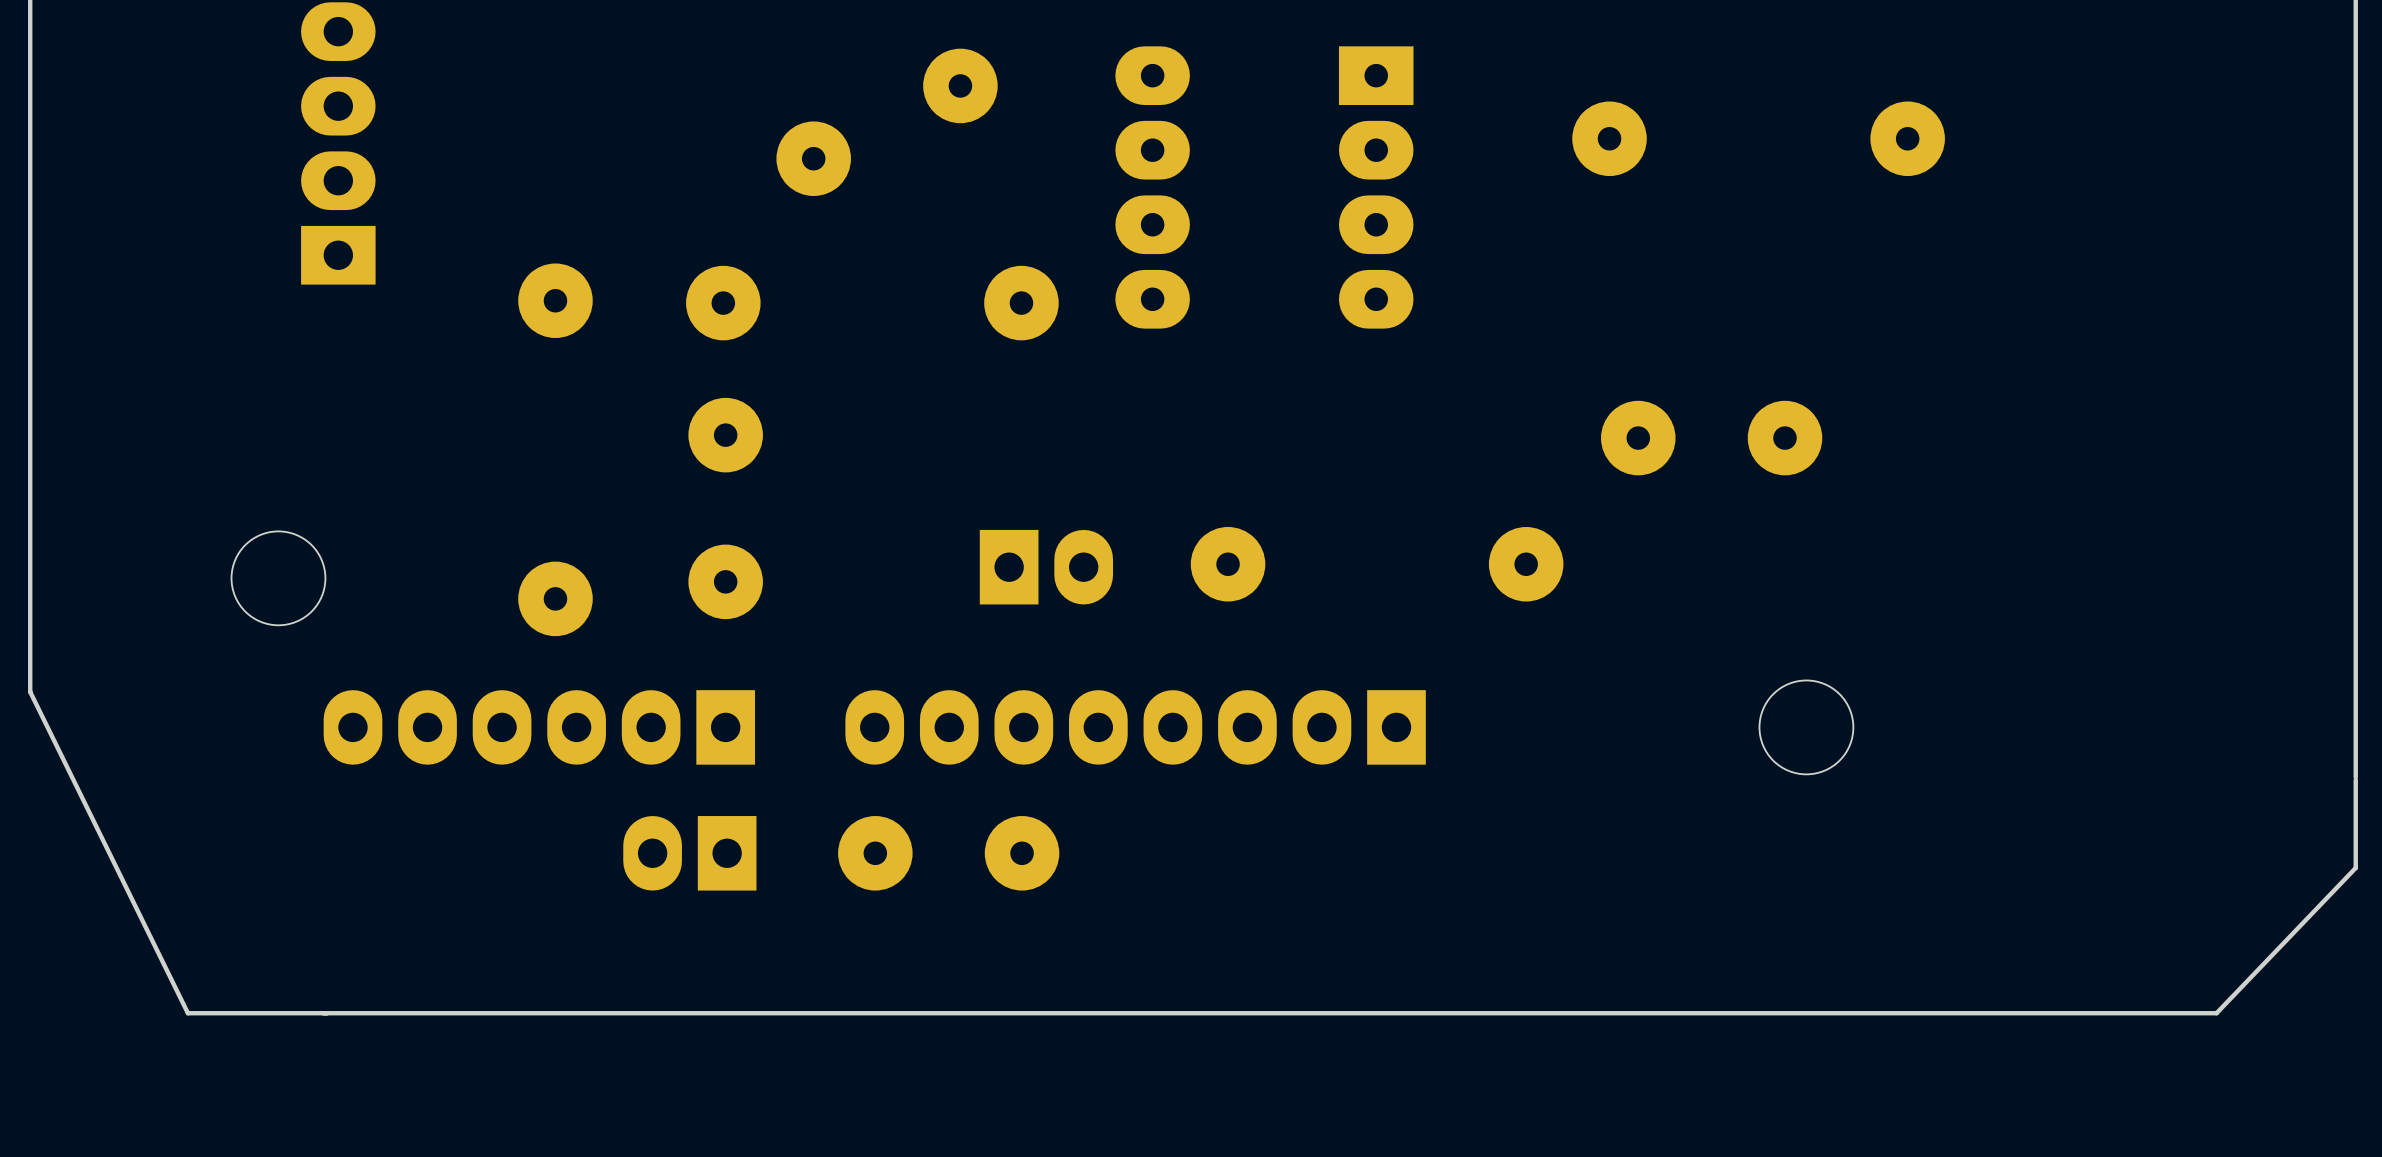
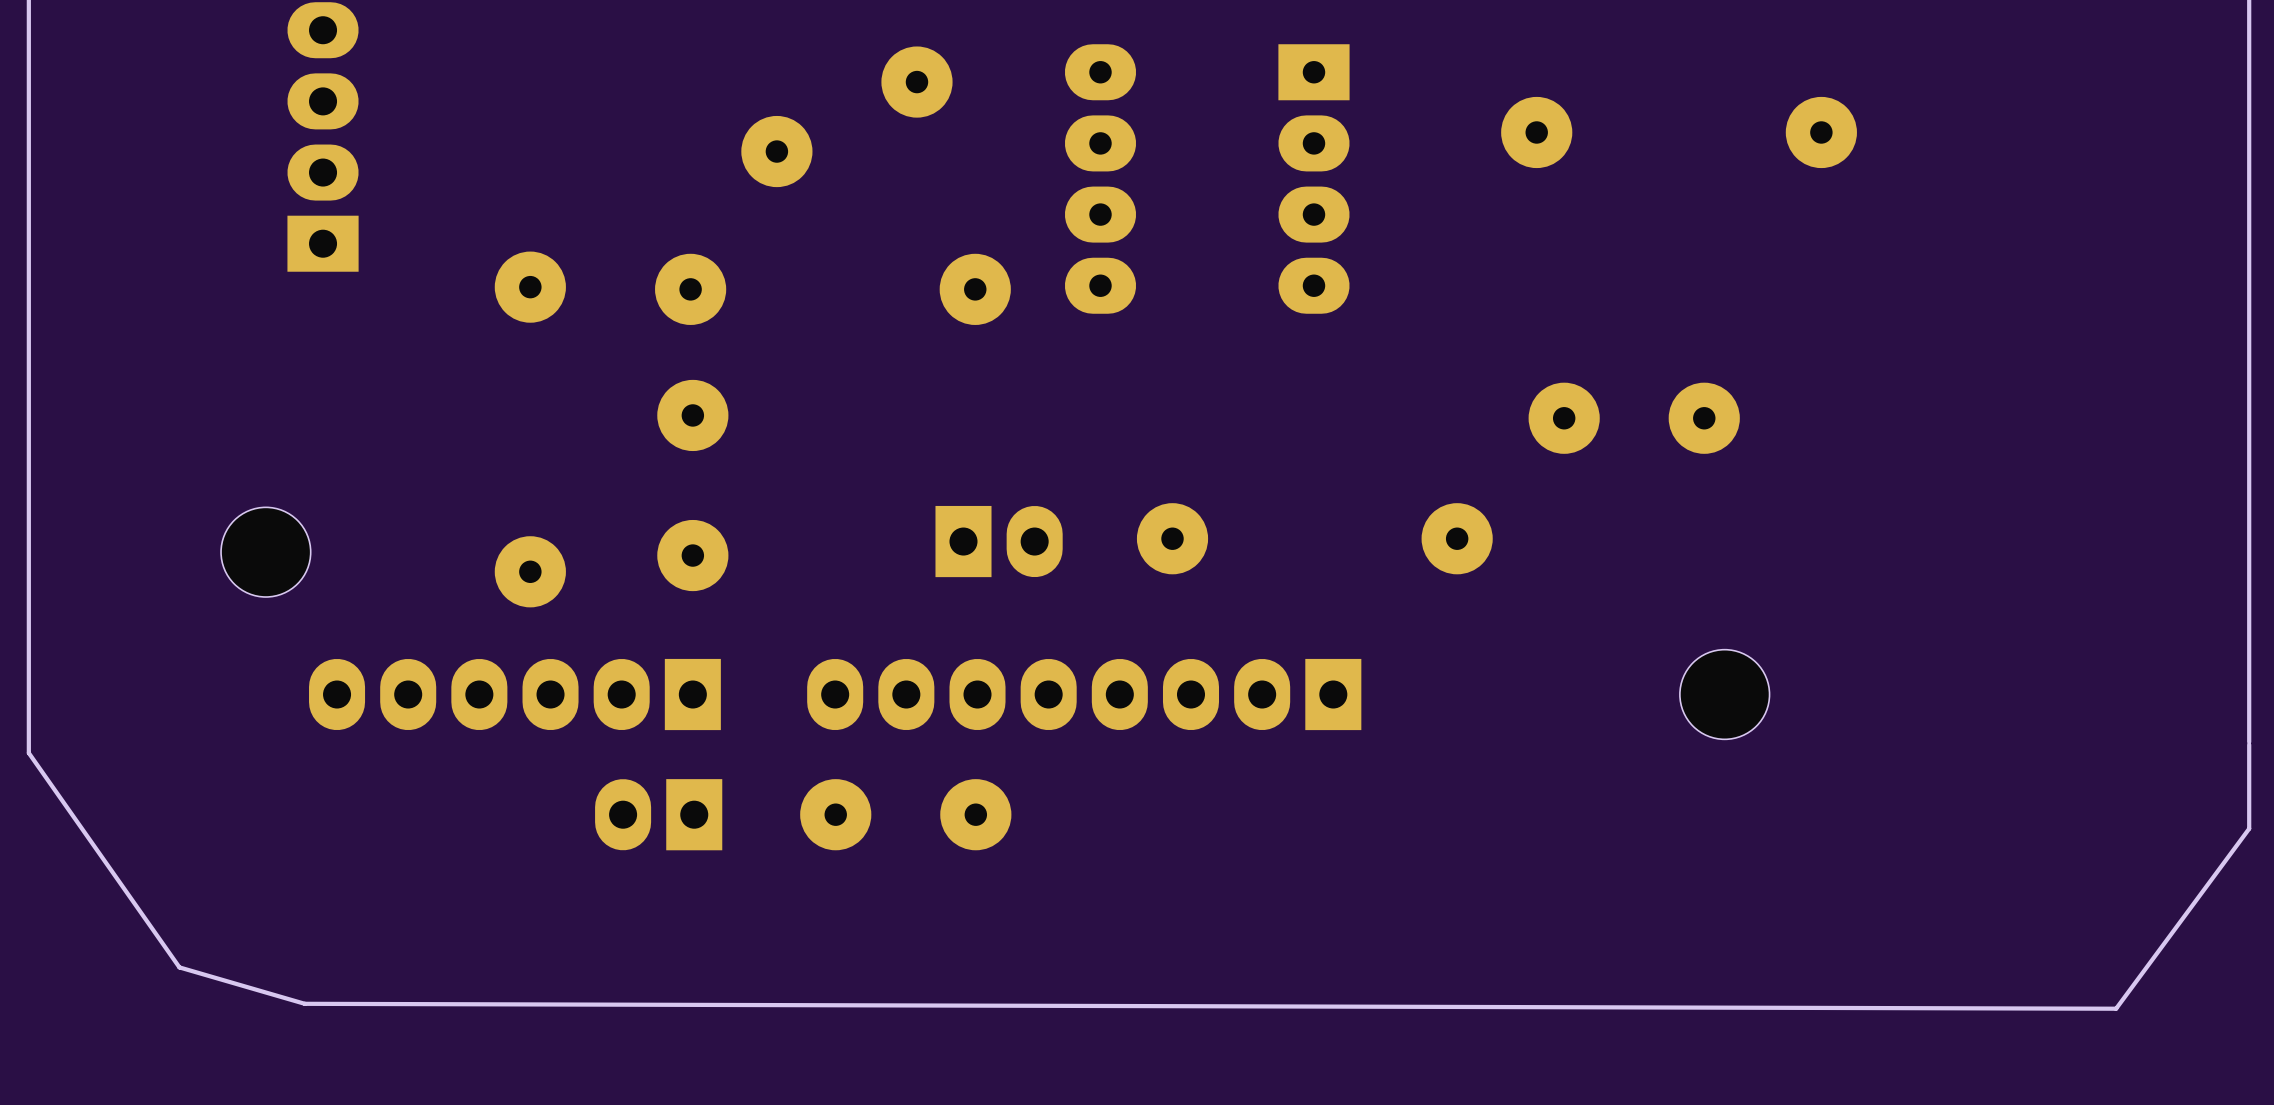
board edge: (30, 691) (187, 1013) (2216, 1013) (2355, 867) -> (28, 660) (28, 753) (179, 967) (304, 1003) (2116, 1008) (2249, 828)

